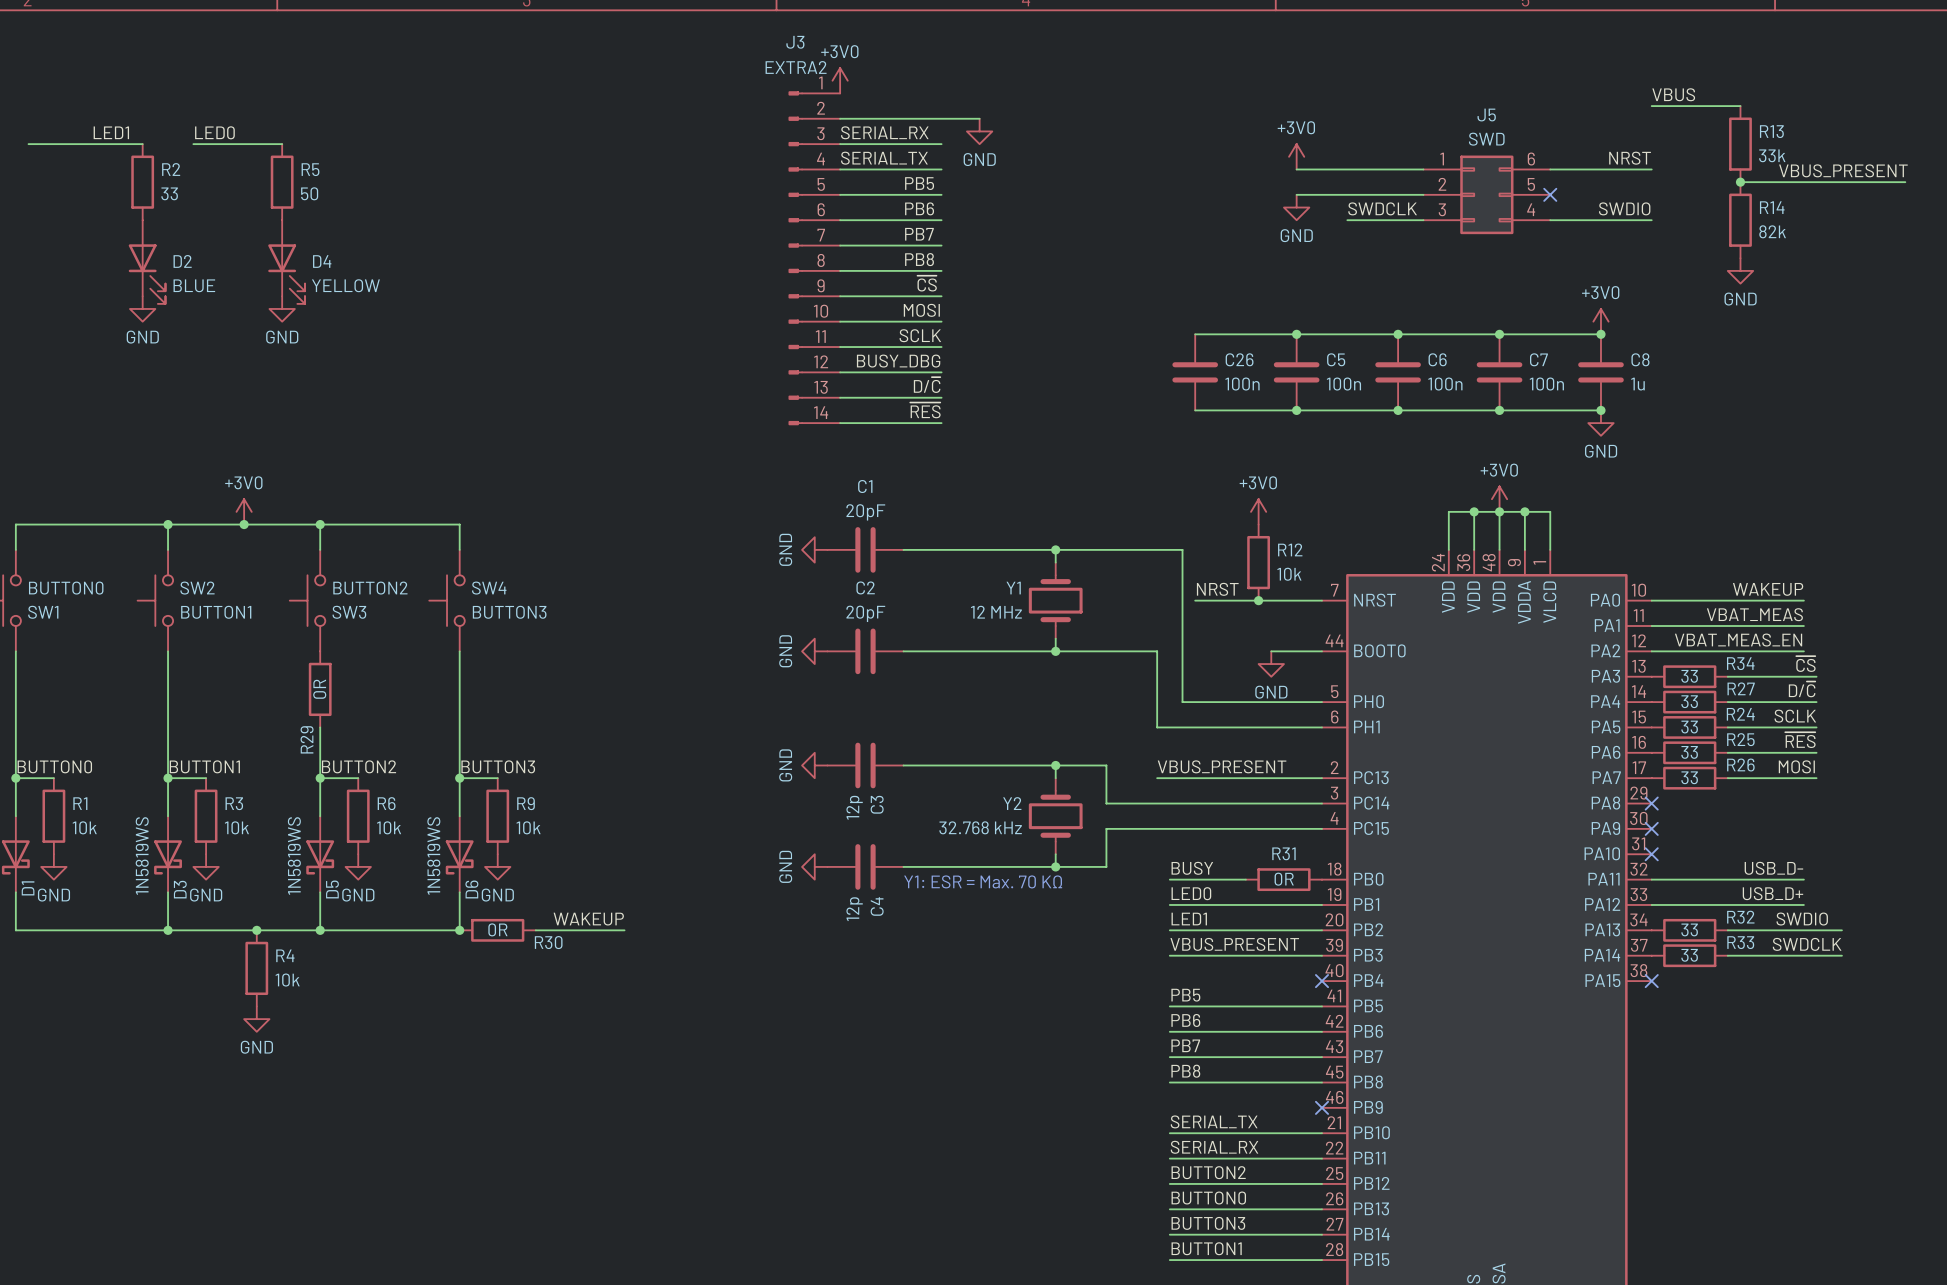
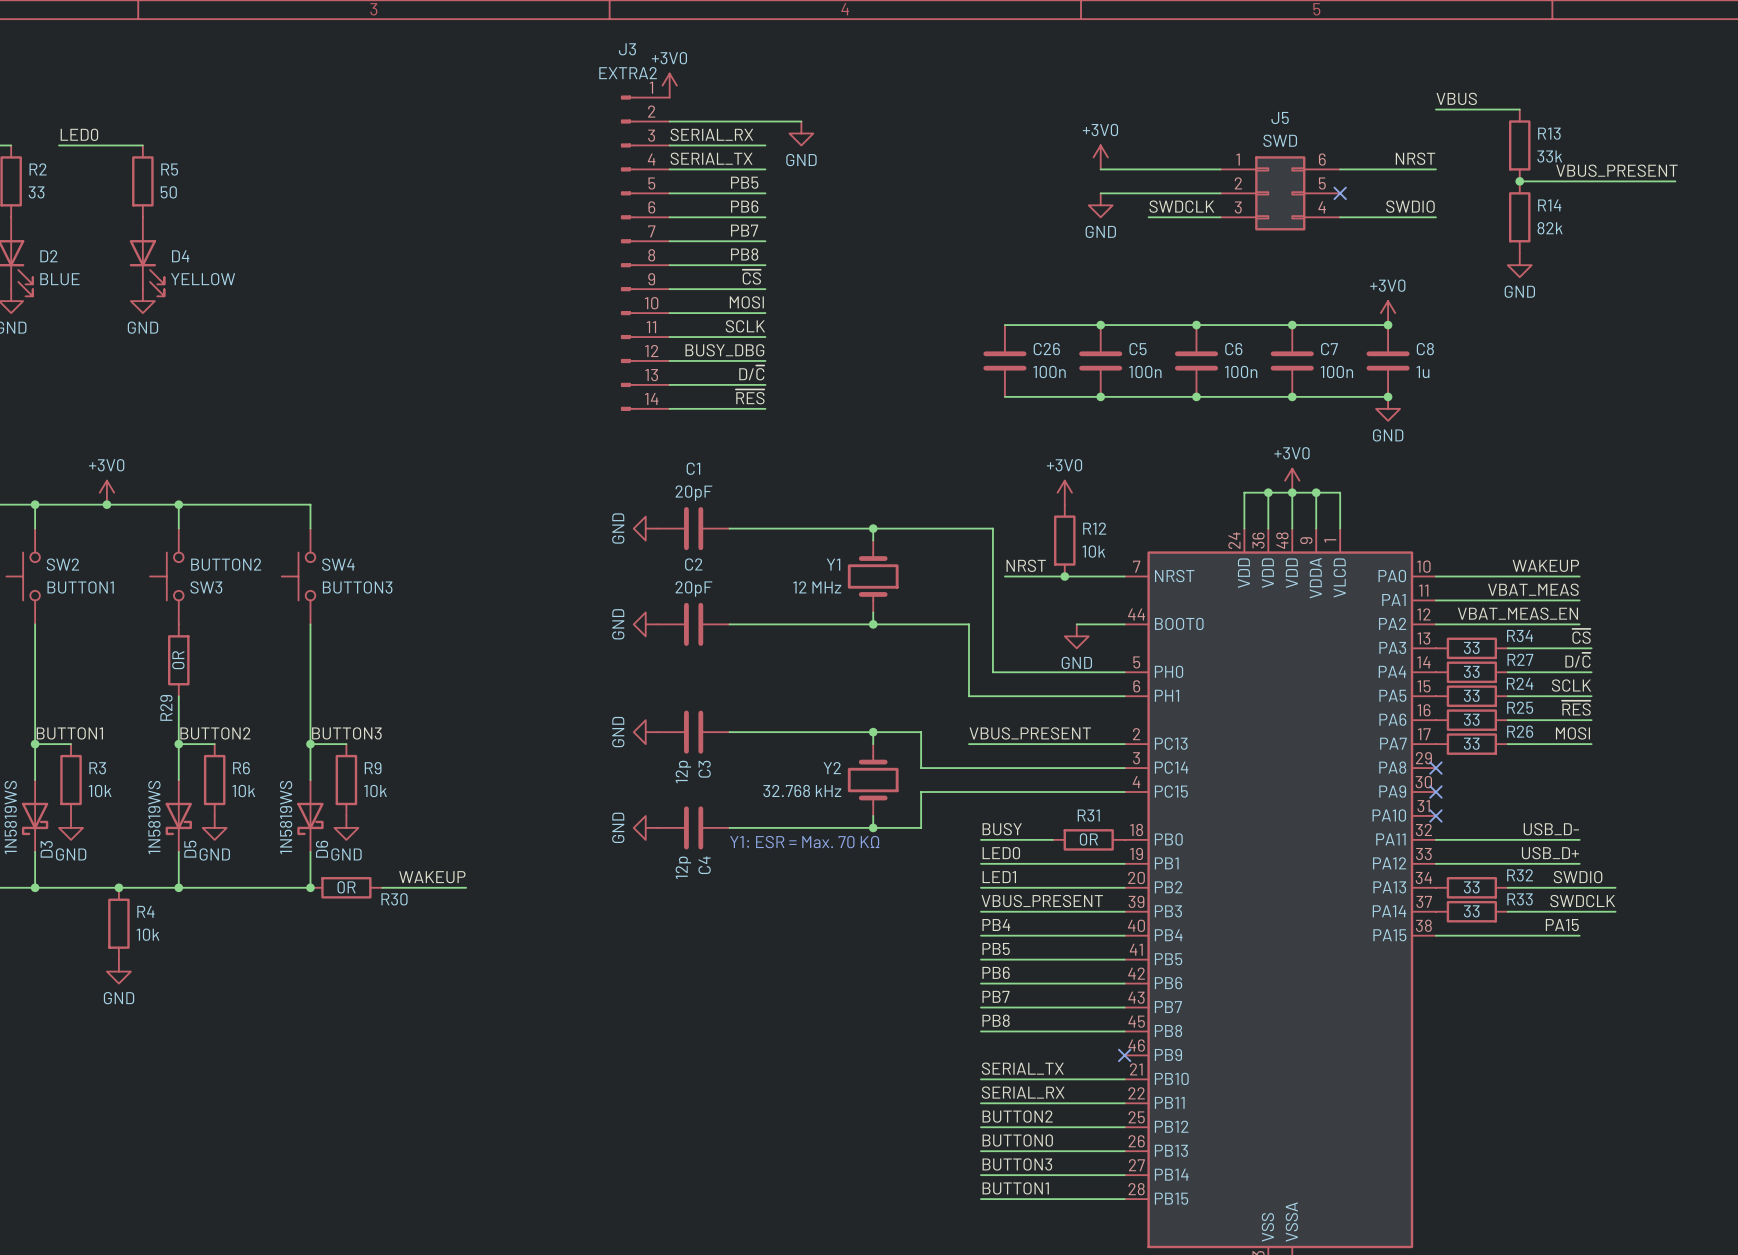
label: none -> PB4 (996, 924)
label: none -> PA15 (1562, 925)
wire: none -> (980, 935) (1124, 935)
no-connect mark: (1322, 981) -> none
wire: none -> (1435, 935) (1579, 935)
no-connect mark: (1651, 981) -> none

